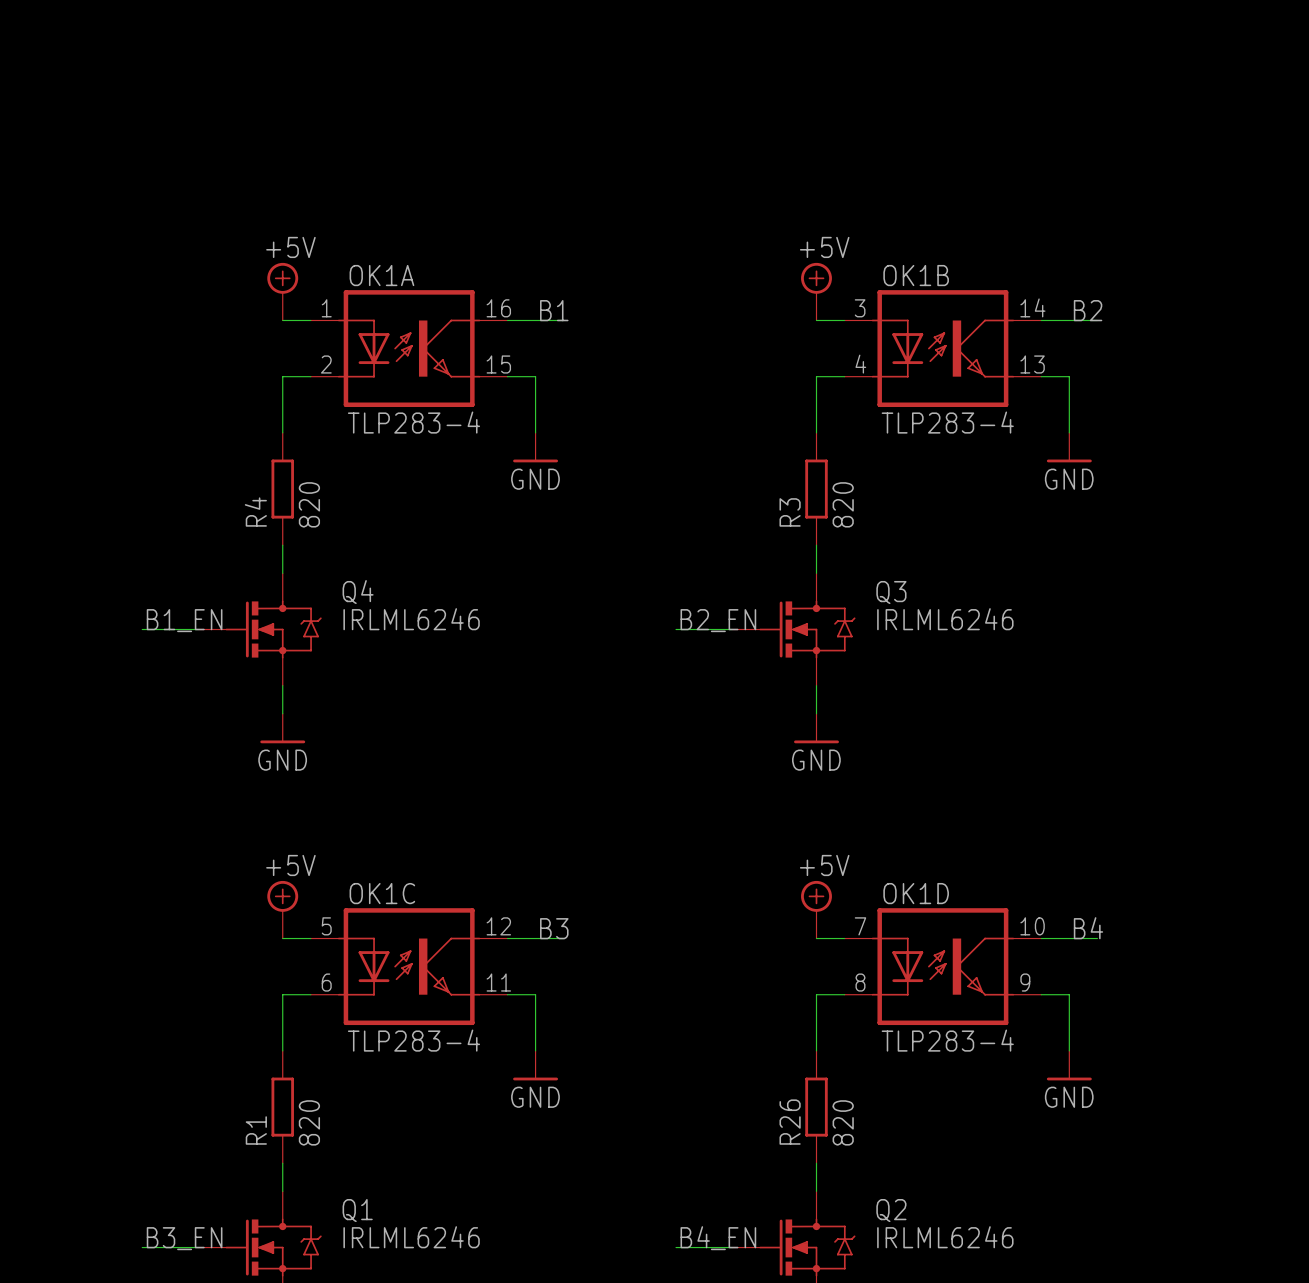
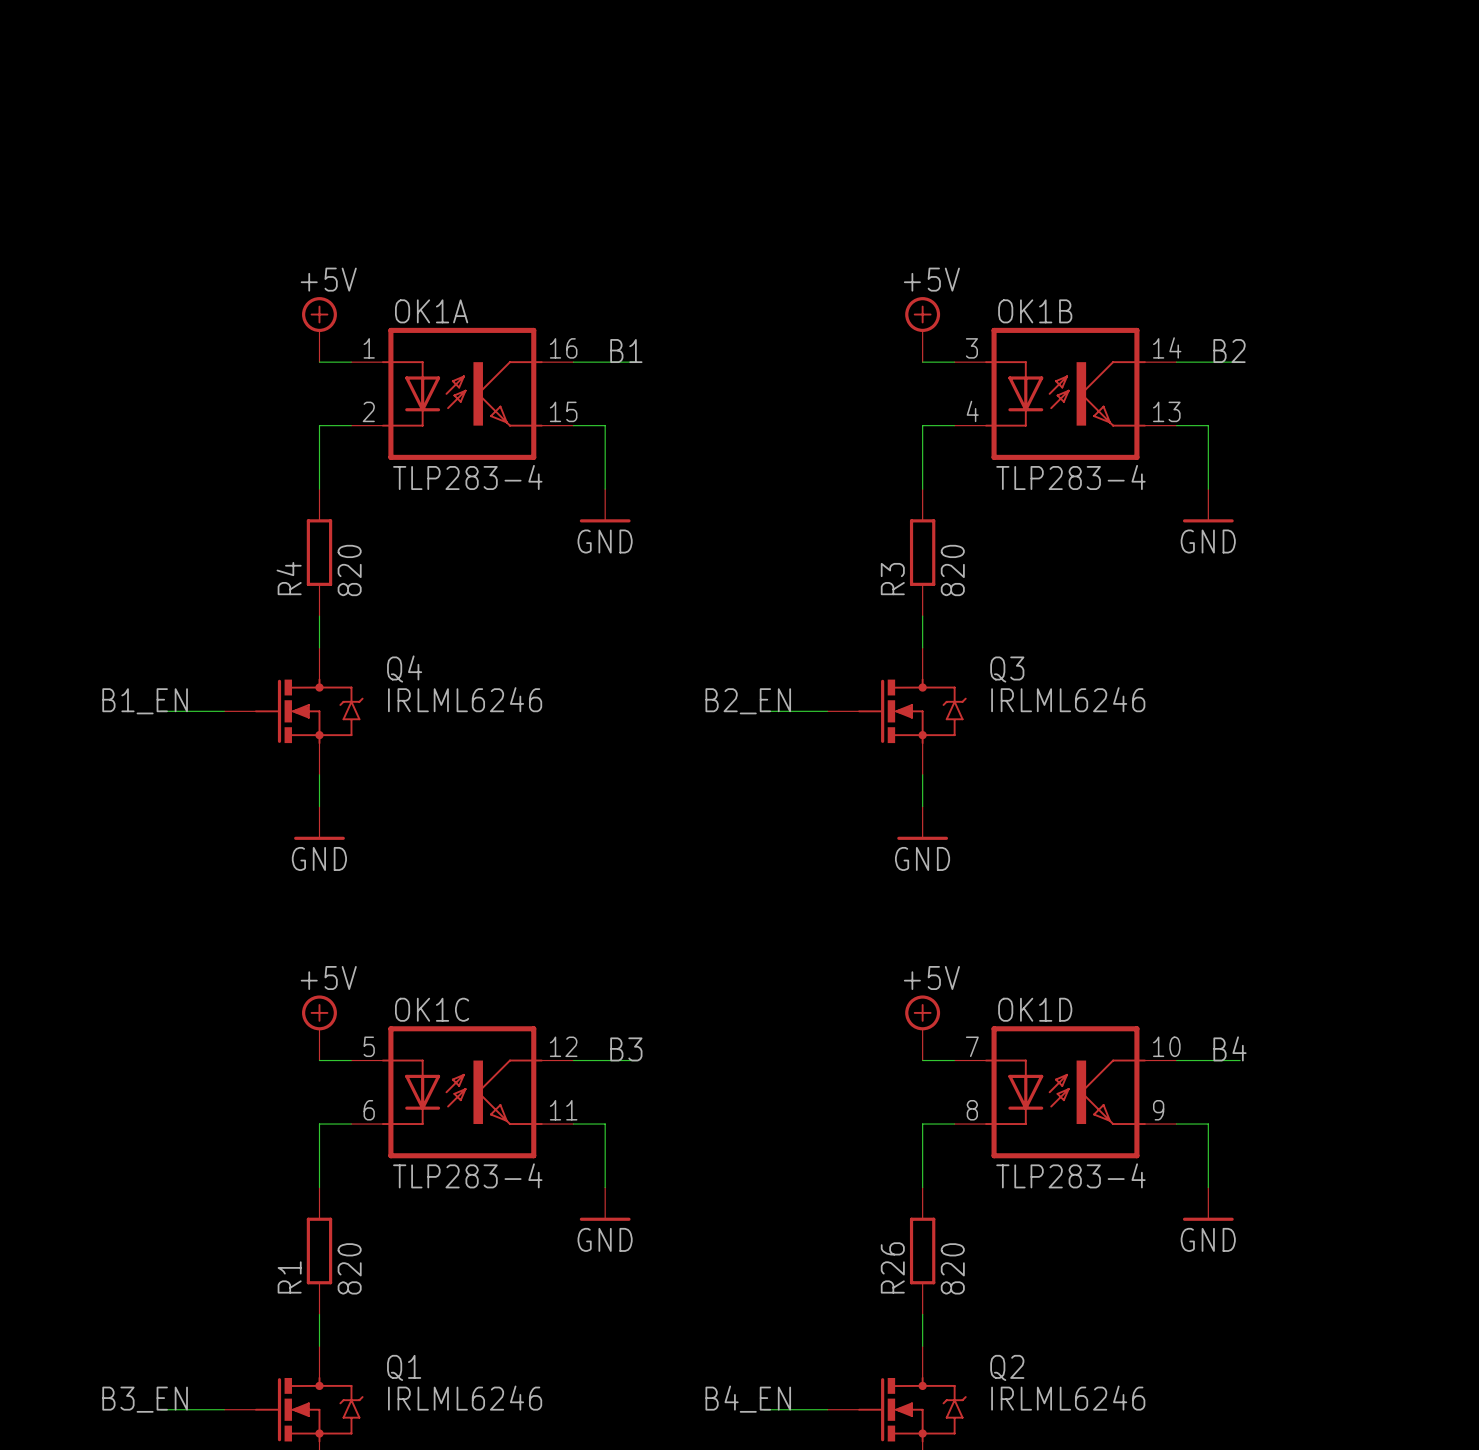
label position: B1_EN (184, 620) -> B1_EN (145, 701)
label position: B2_EN (718, 620) -> B2_EN (748, 701)
label position: B3_EN (184, 1238) -> B3_EN (145, 1399)
label position: B4_EN (718, 1238) -> B4_EN (748, 1399)

